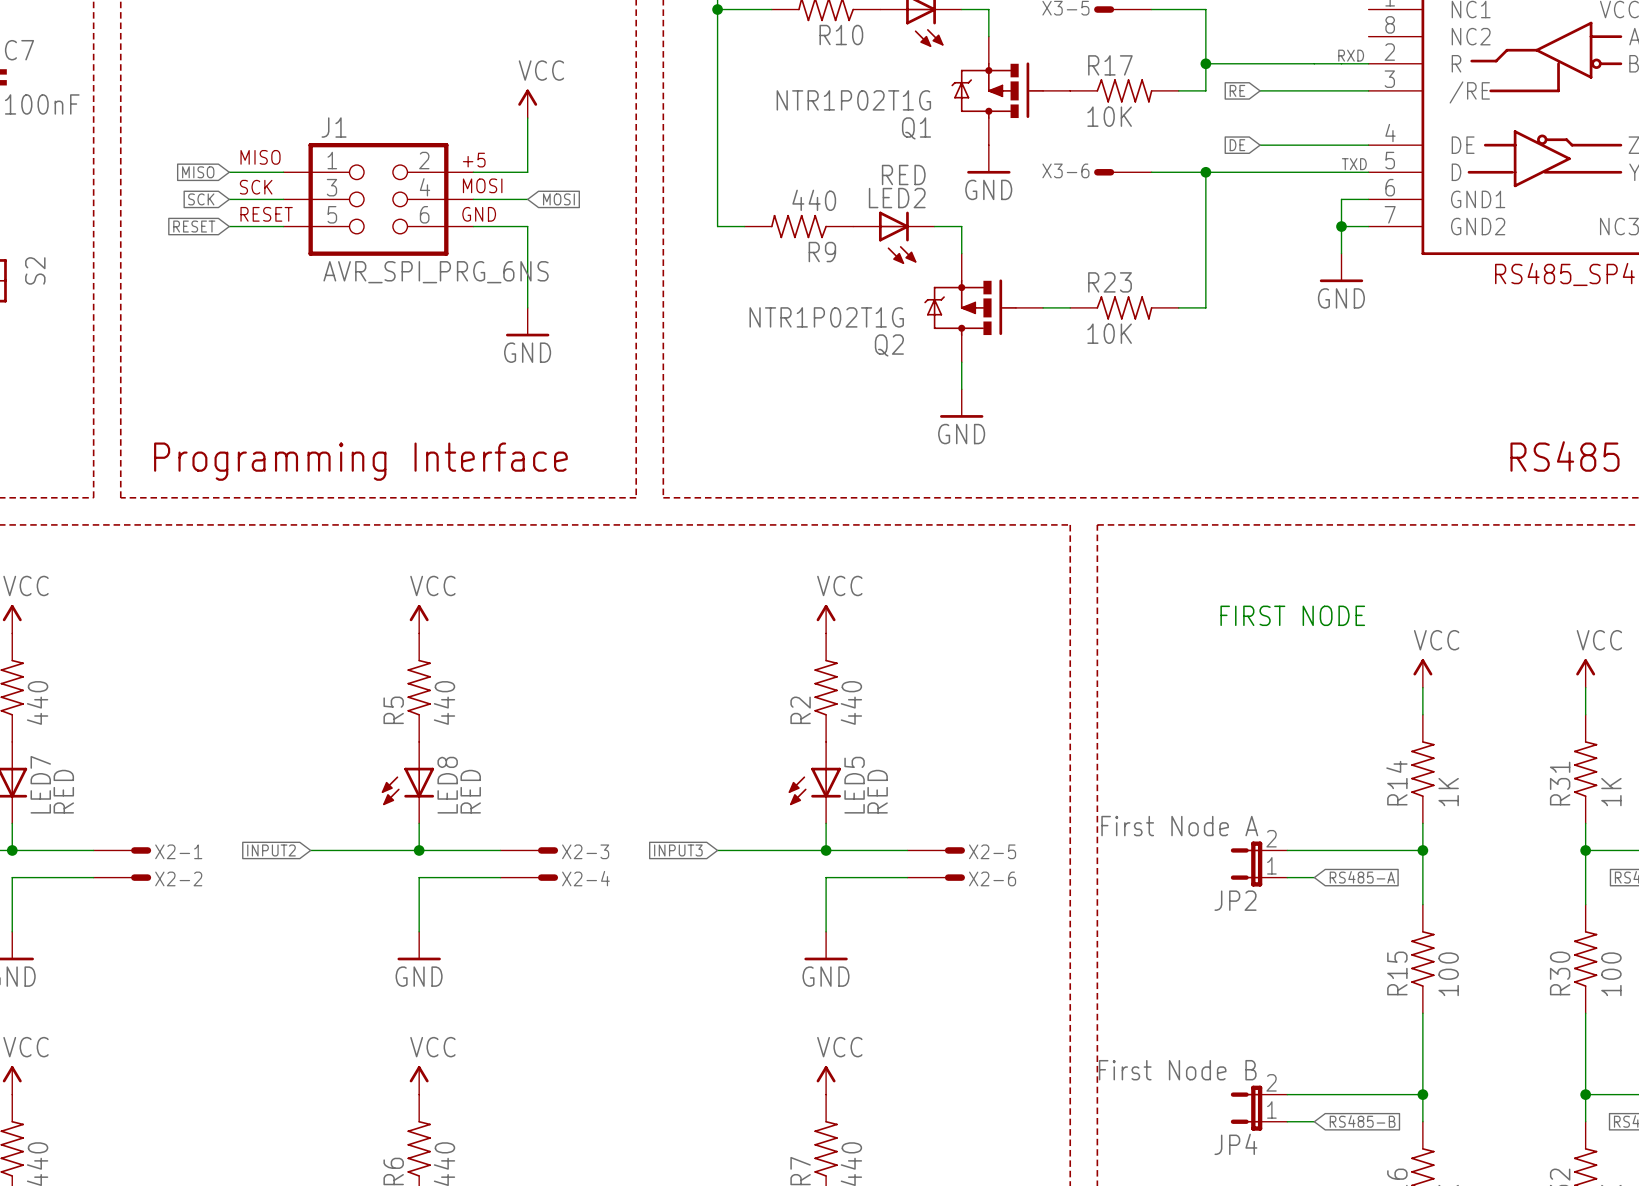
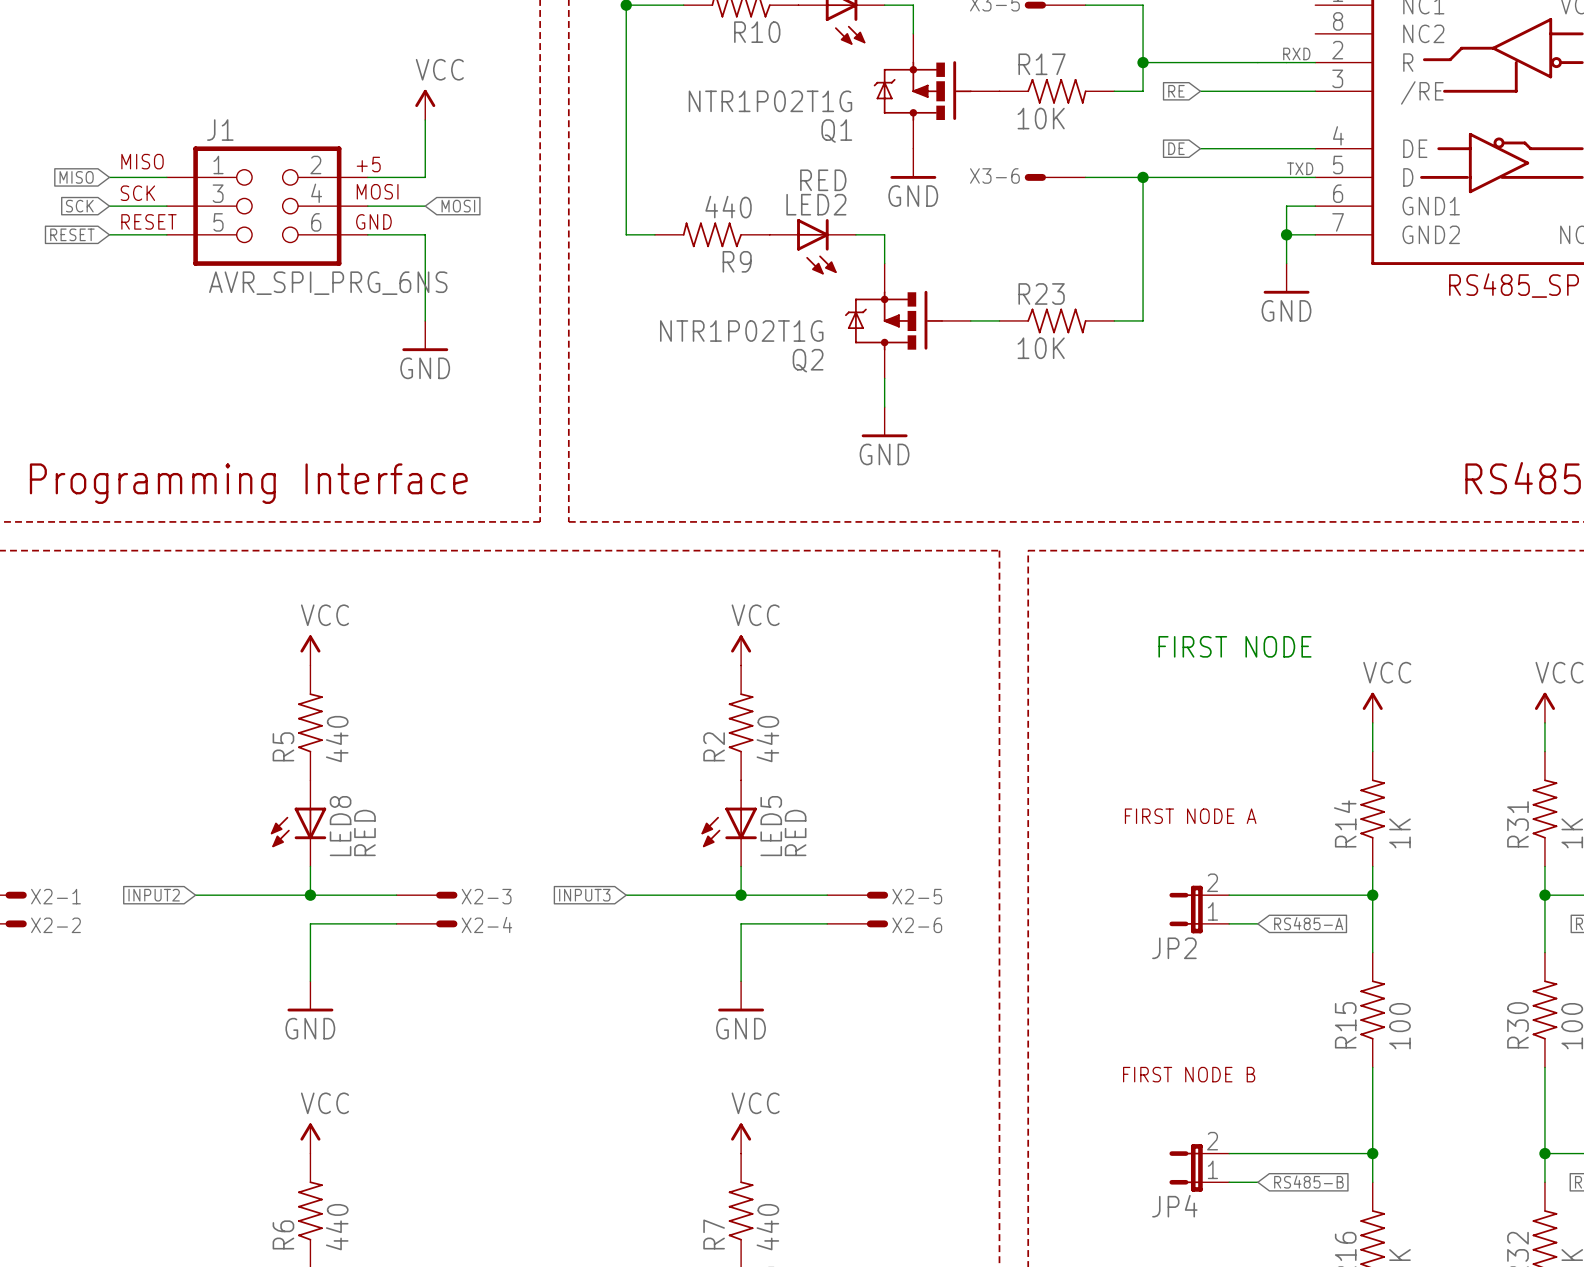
text: none -> FIRST NODE A (1190, 816)
JP2 value: First Node A (1179, 826) -> none
text: none -> FIRST NODE B (1189, 1074)
JP4 value: First Node B (1177, 1070) -> none

